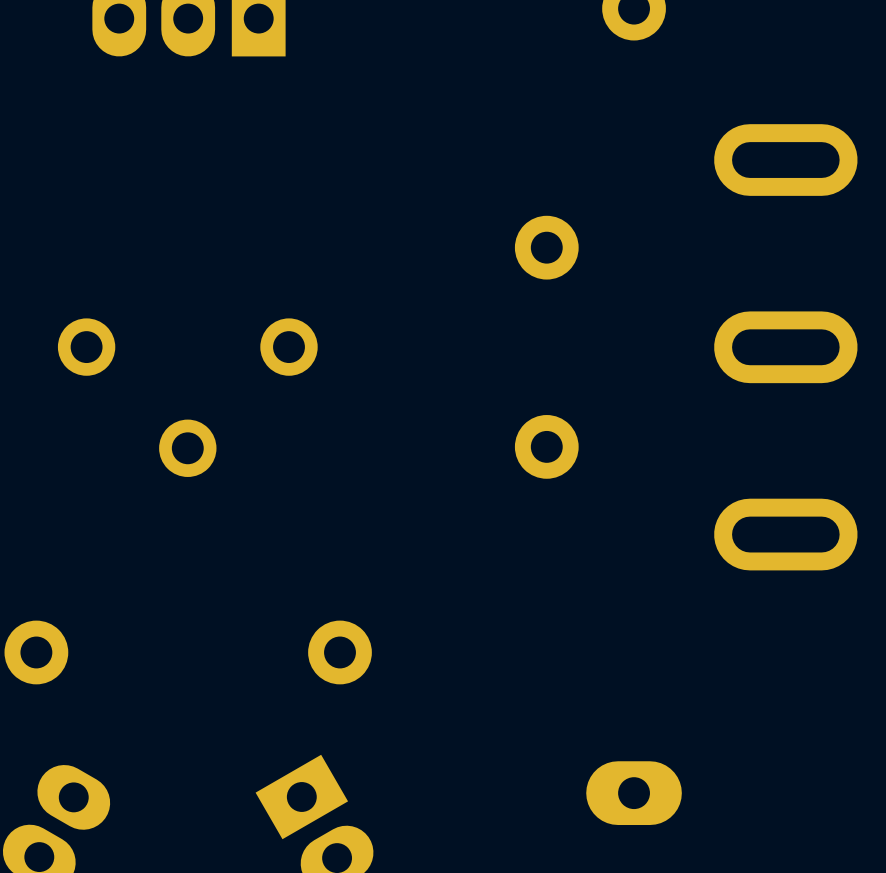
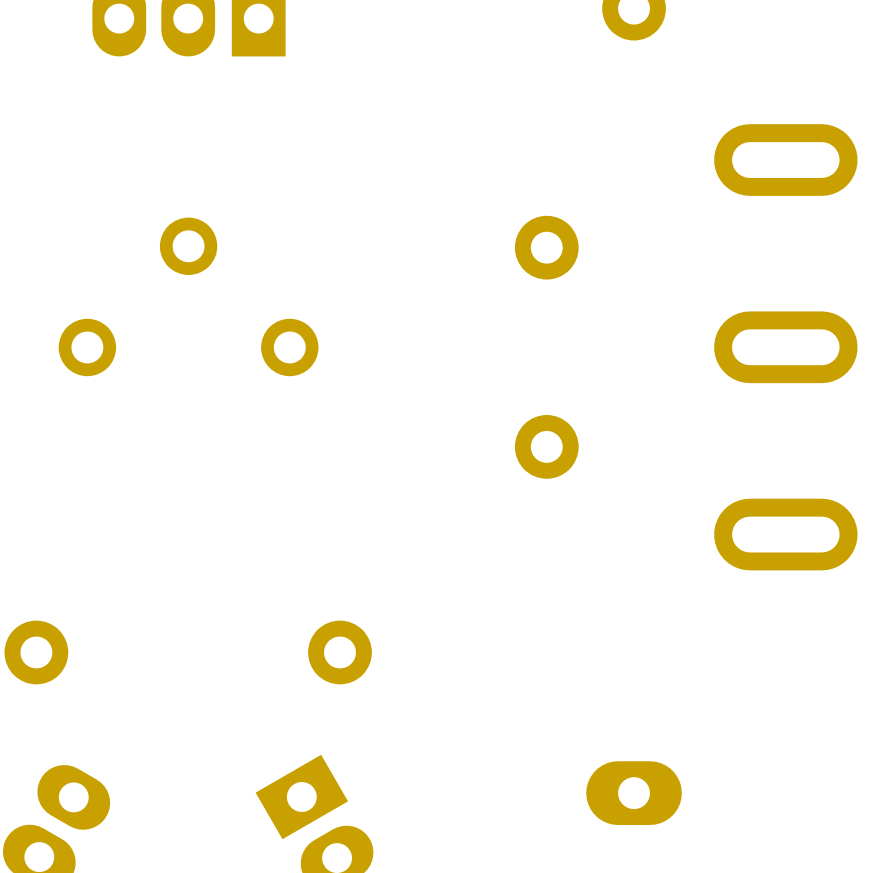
part rotation: 0° (187, 397) -> 180° (188, 296)

